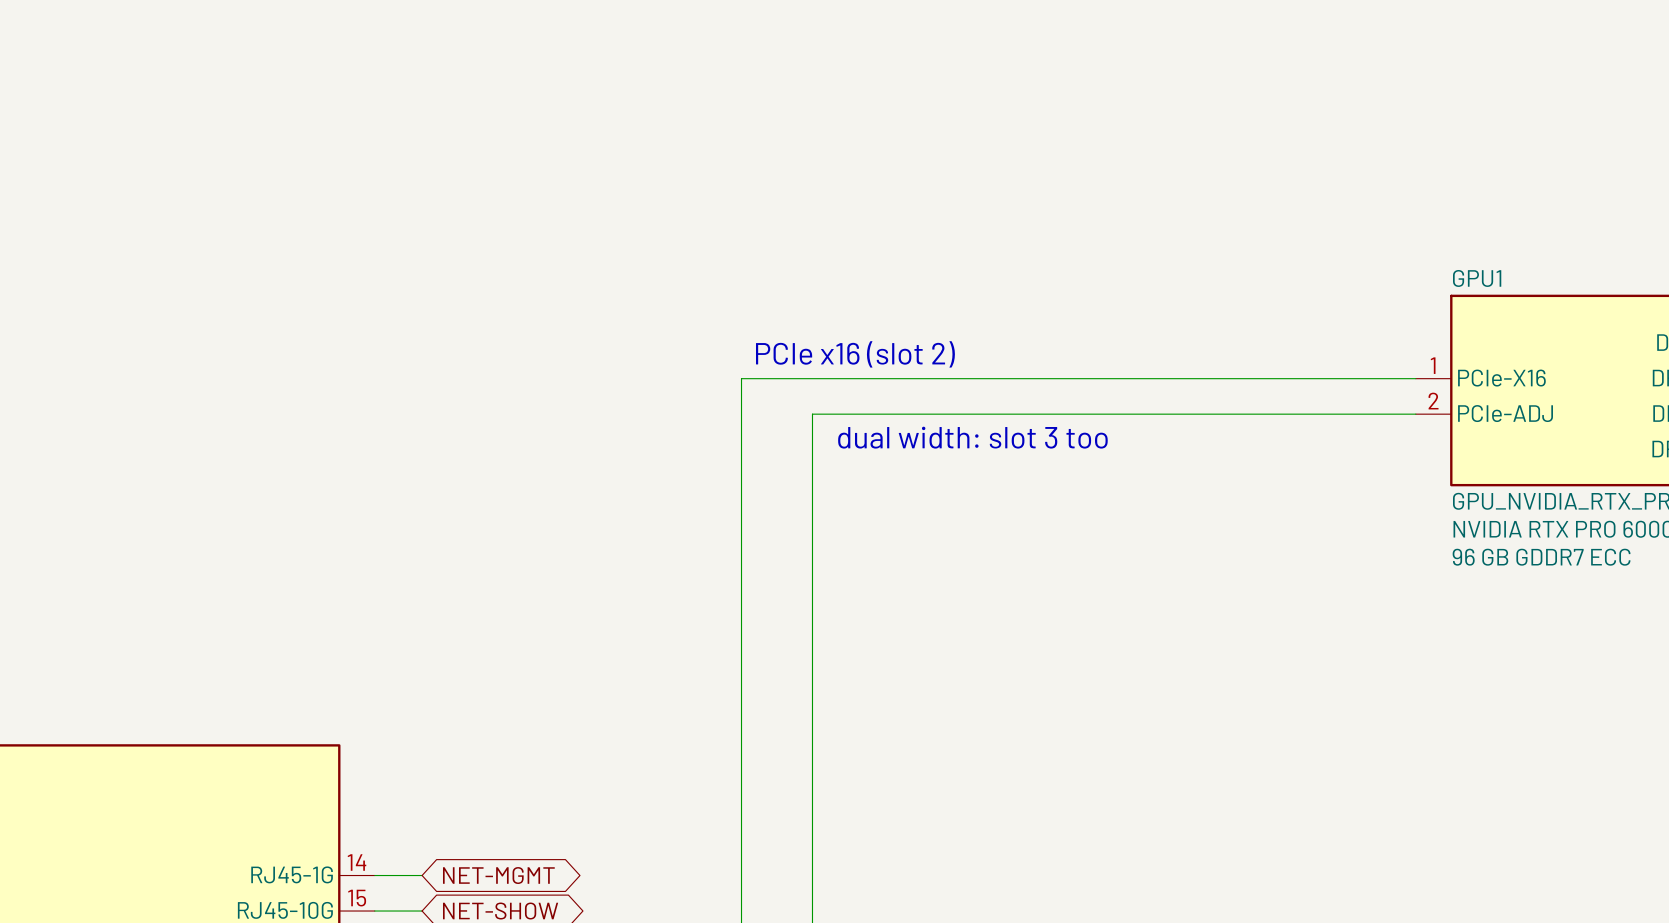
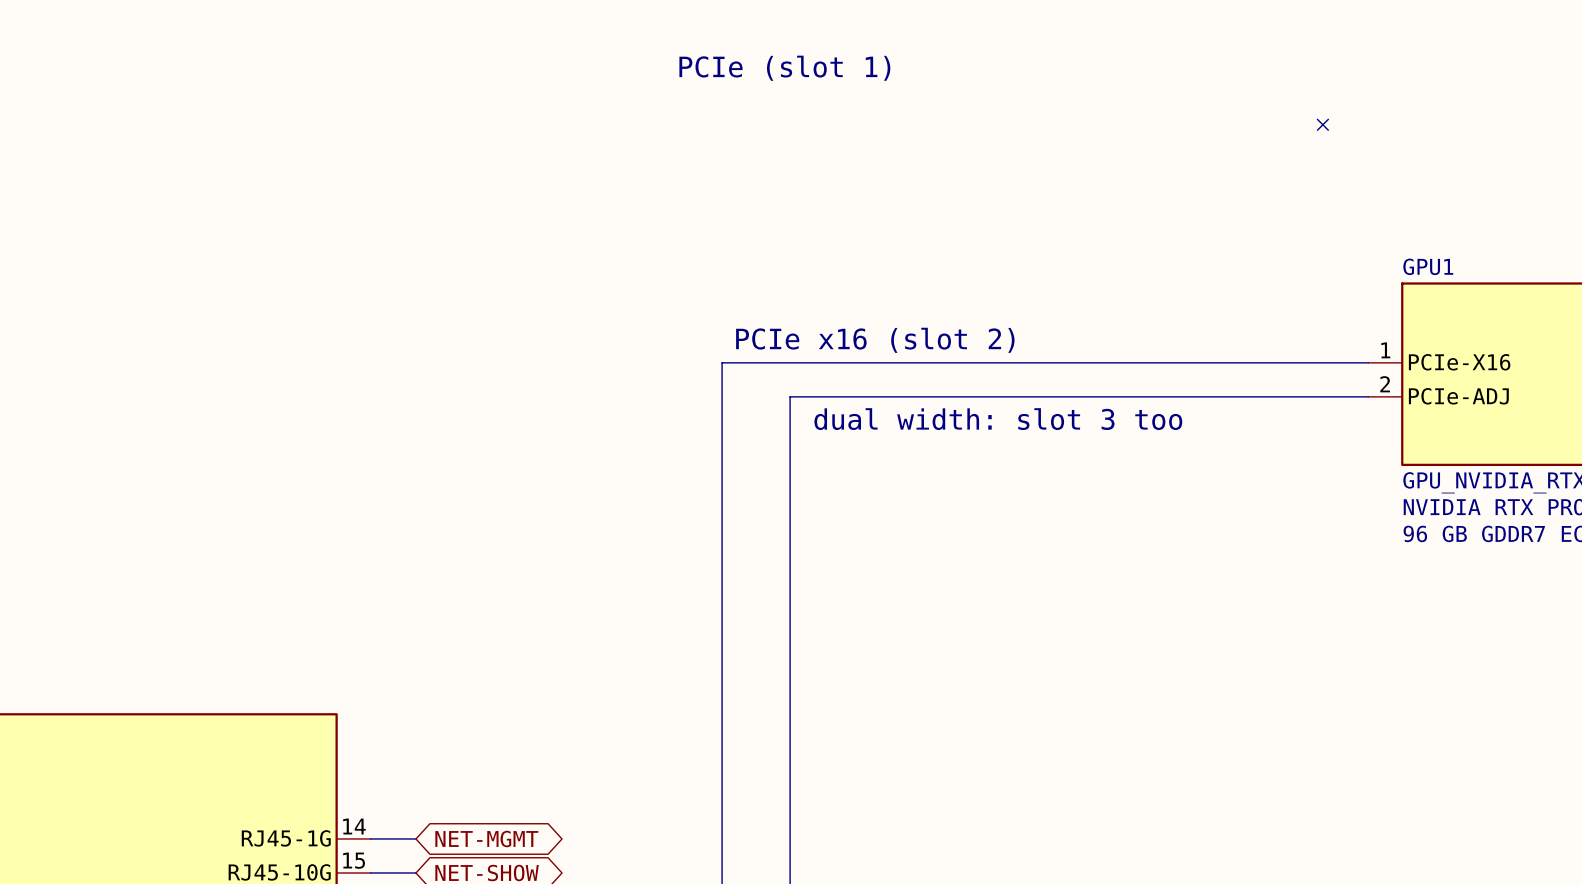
text: none -> PCIe (slot 1) (784, 68)
no-connect mark: none -> (1322, 124)

